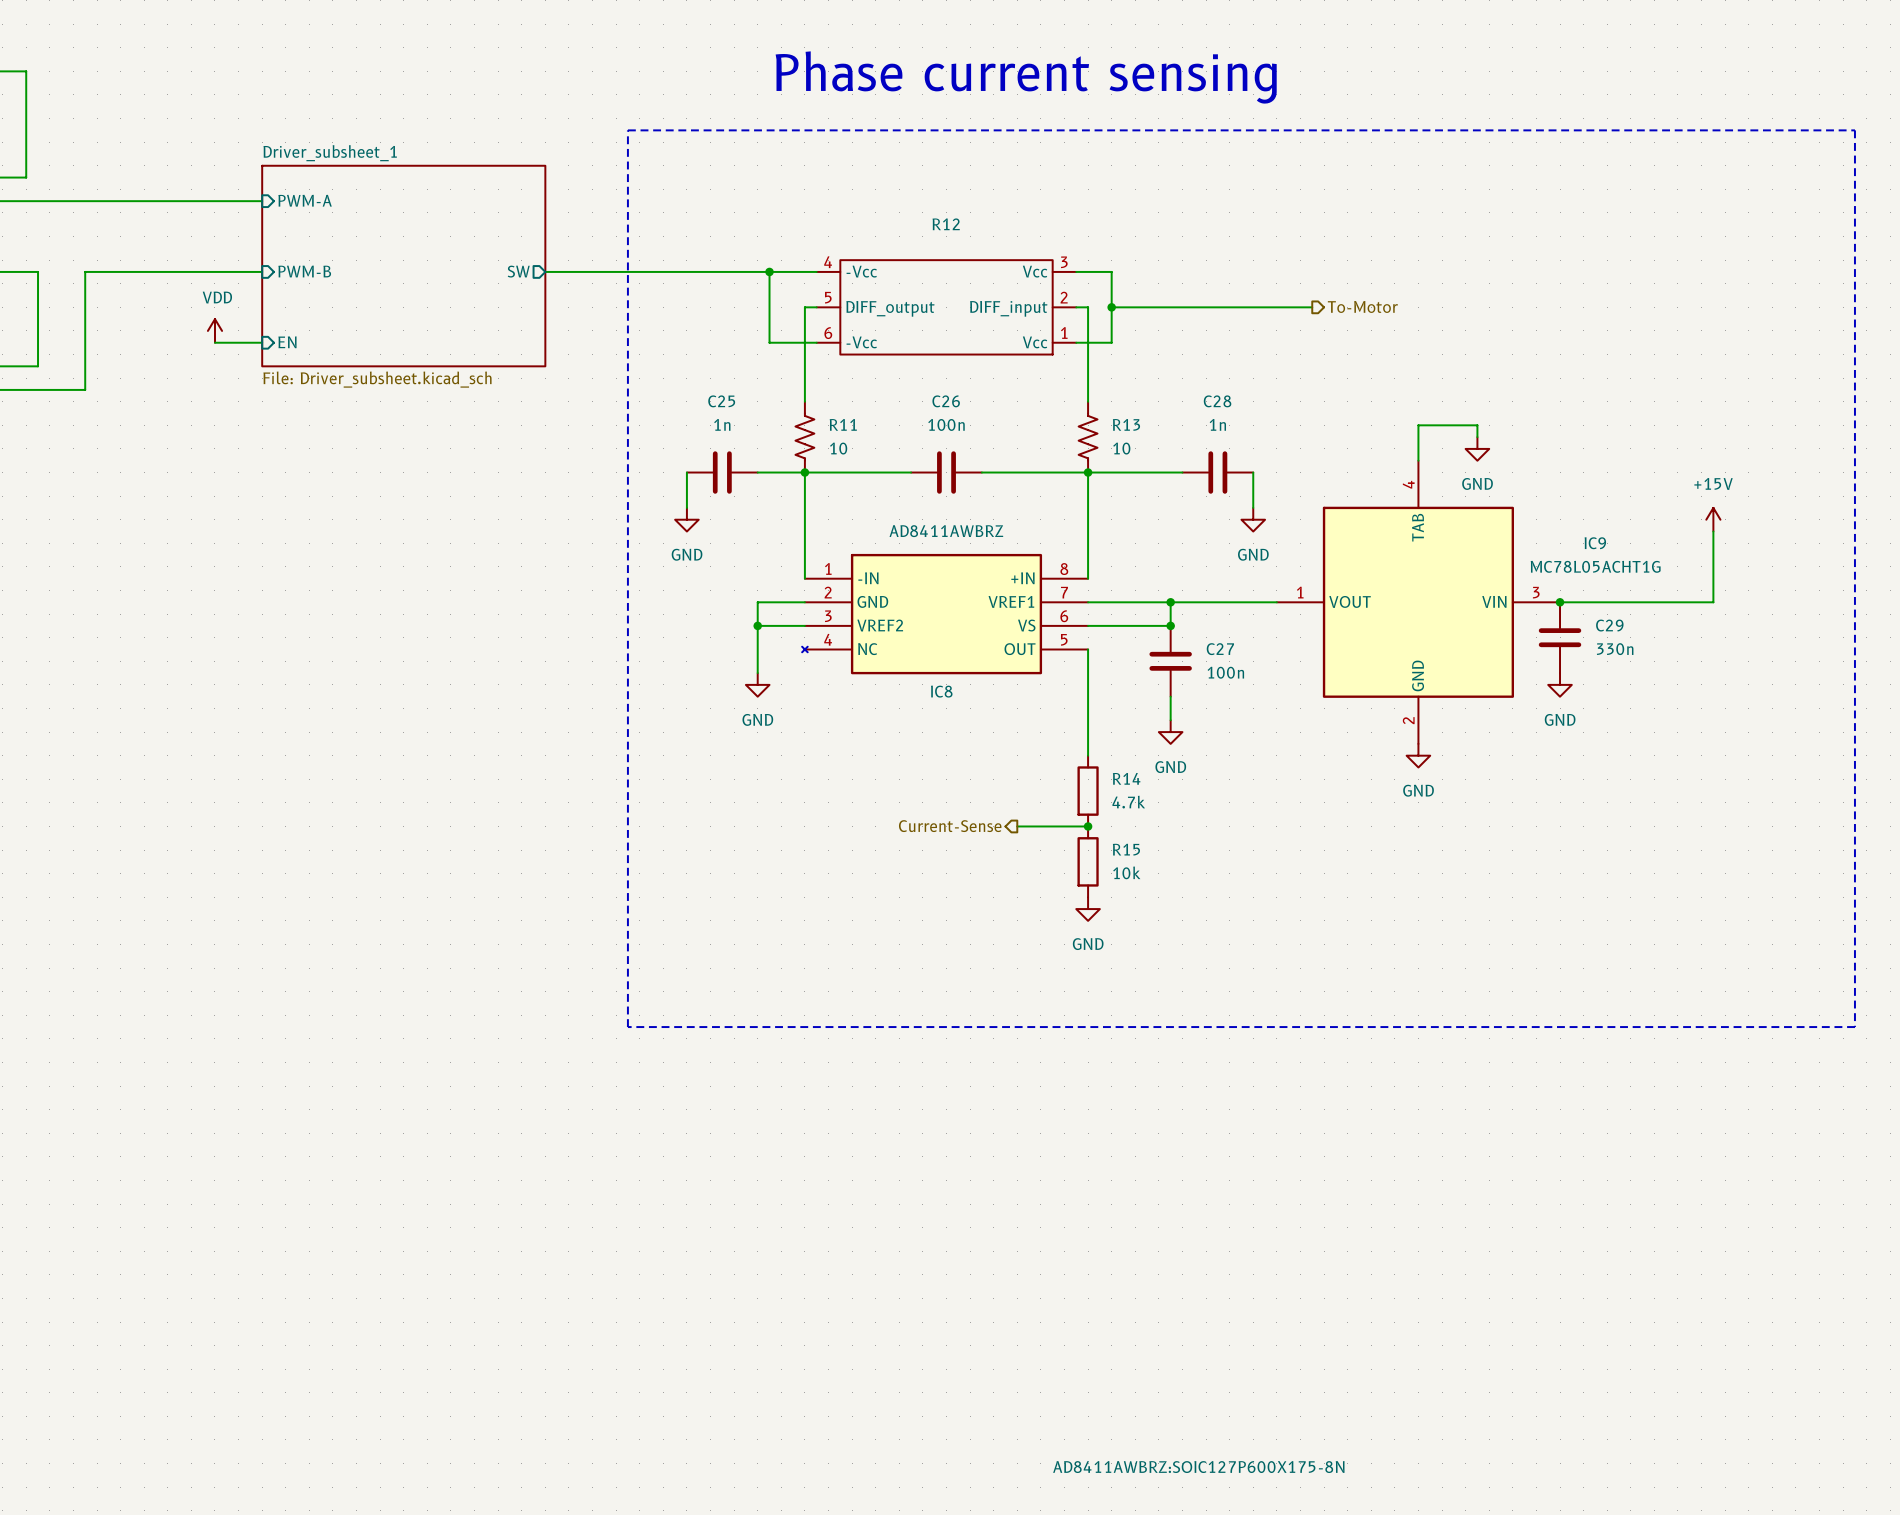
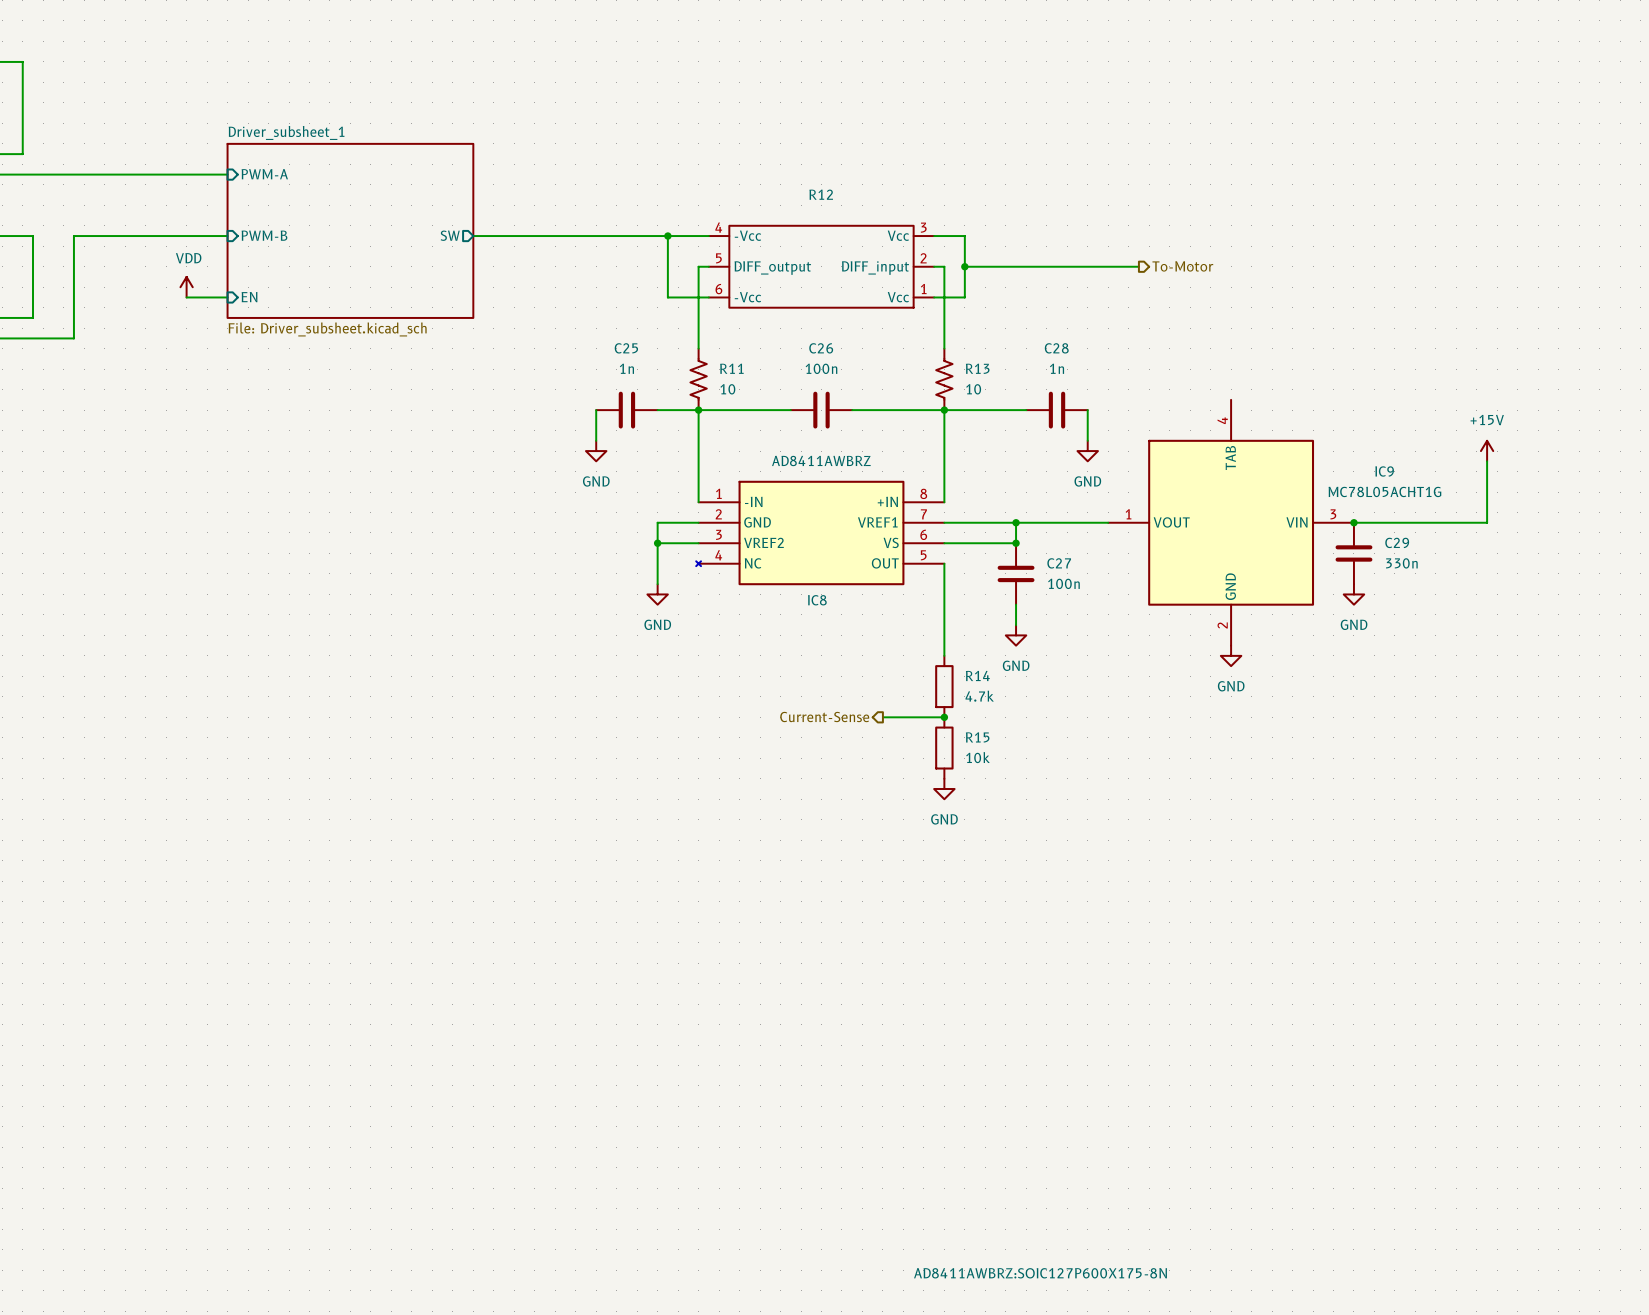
text: Phase current sensing (1026, 77) -> none
line: (627, 130) (1854, 130) (1854, 1027) (627, 1027) (627, 130) -> none
wire: (1477, 437) (1477, 425) (1418, 425) (1418, 460) -> none
power symbol: GND (1477, 448) -> none

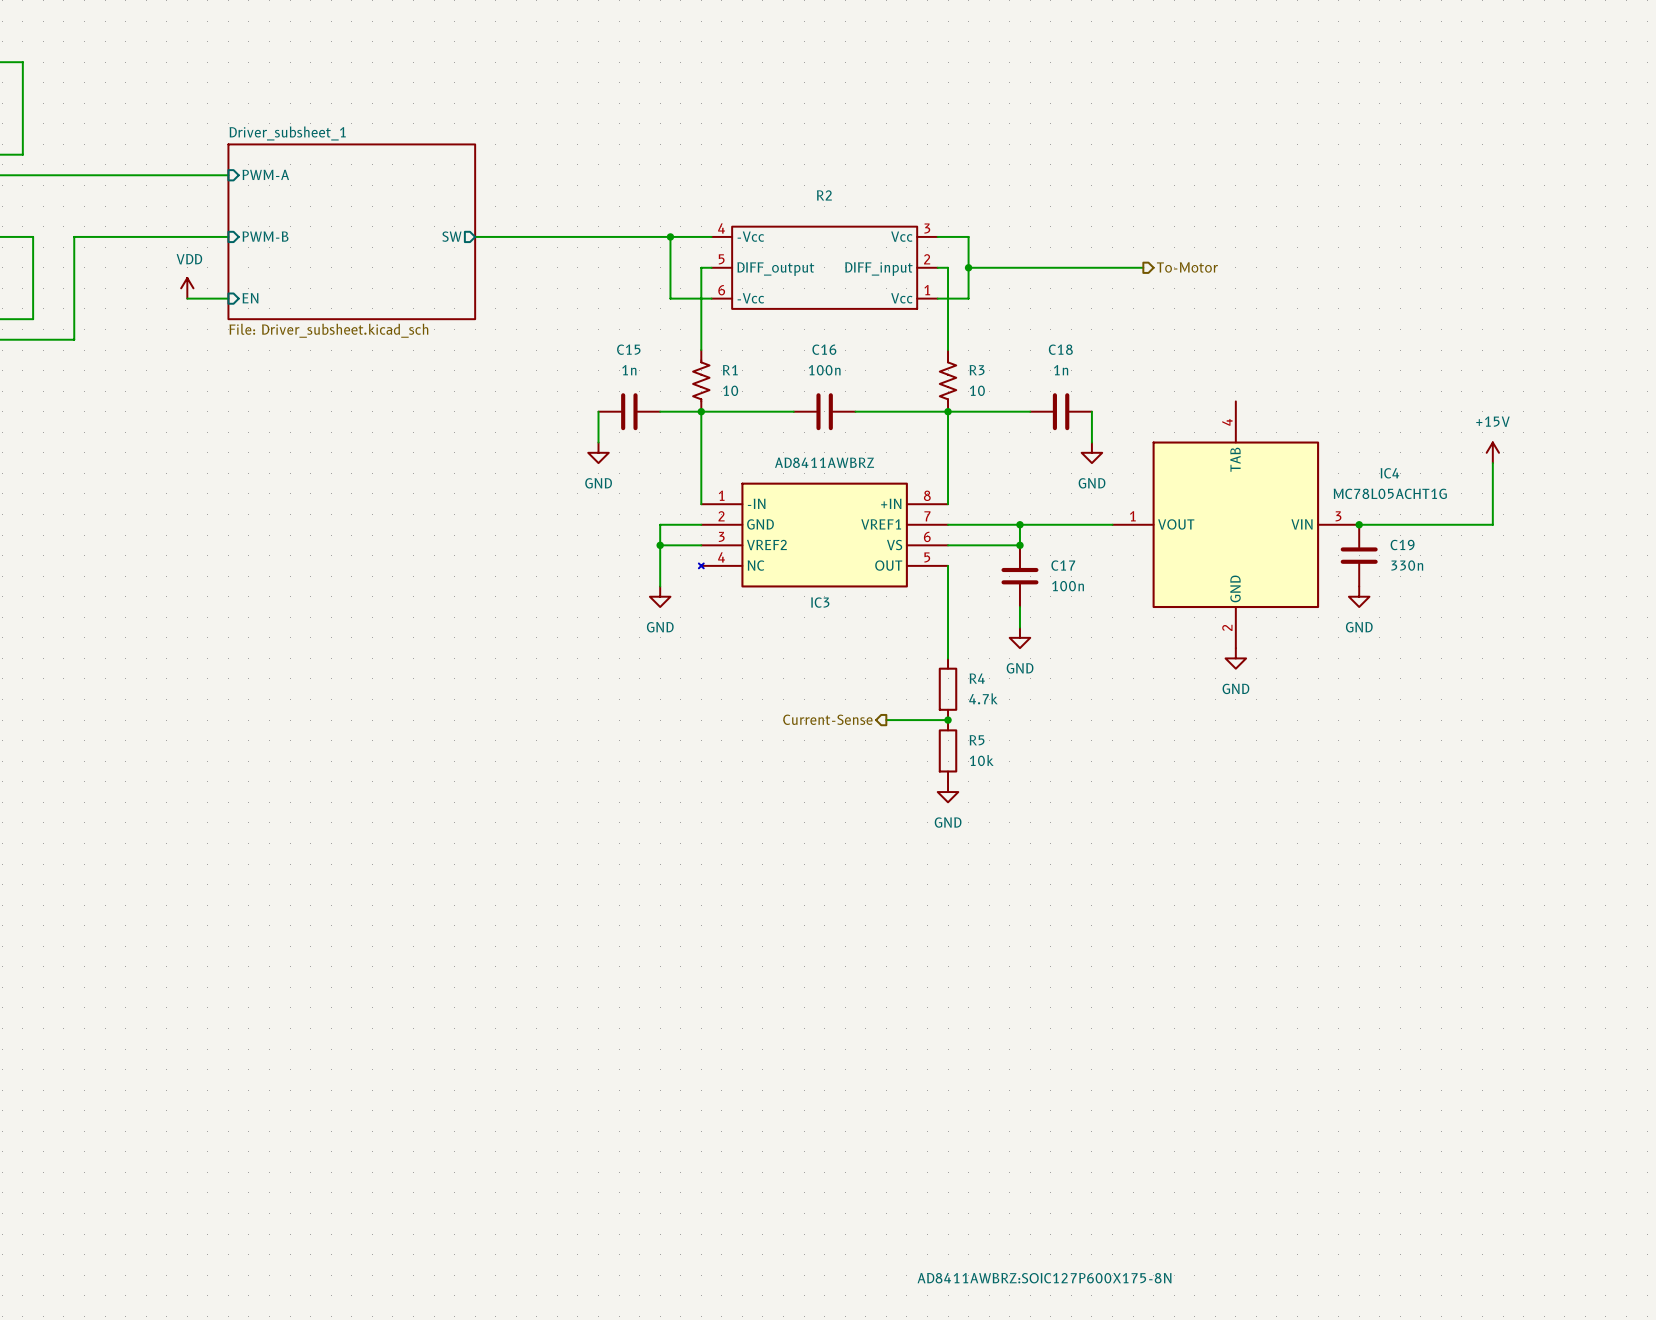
R12 name: R12 (821, 194) -> R2 (824, 195)
C25 name: C25 (626, 348) -> C15 (628, 349)
C26 name: C26 (821, 348) -> C16 (824, 349)
C28 name: C28 (1056, 348) -> C18 (1060, 349)
R11 name: R11 (731, 368) -> R1 (730, 370)
R13 name: R13 (977, 368) -> R3 (977, 370)
IC9 name: IC9 (1384, 471) -> IC4 (1389, 473)
C29 name: C29 (1397, 542) -> C19 (1402, 545)
C27 name: C27 (1059, 563) -> C17 (1063, 565)
IC8 name: IC8 (817, 600) -> IC3 (820, 602)
R14 name: R14 (977, 675) -> R4 (977, 678)
R15 name: R15 (977, 737) -> R5 (977, 740)

